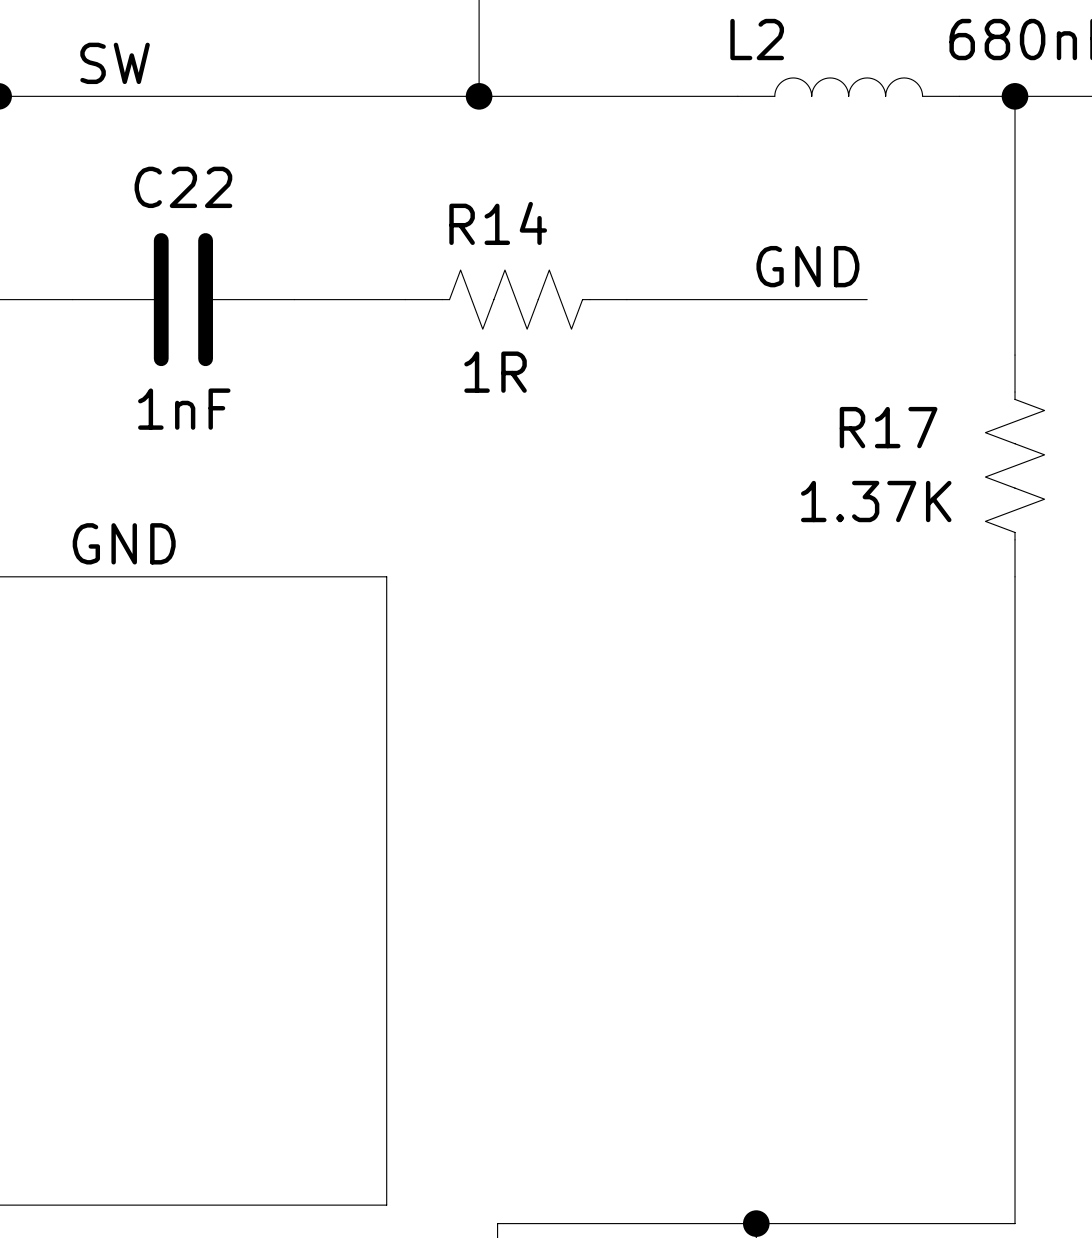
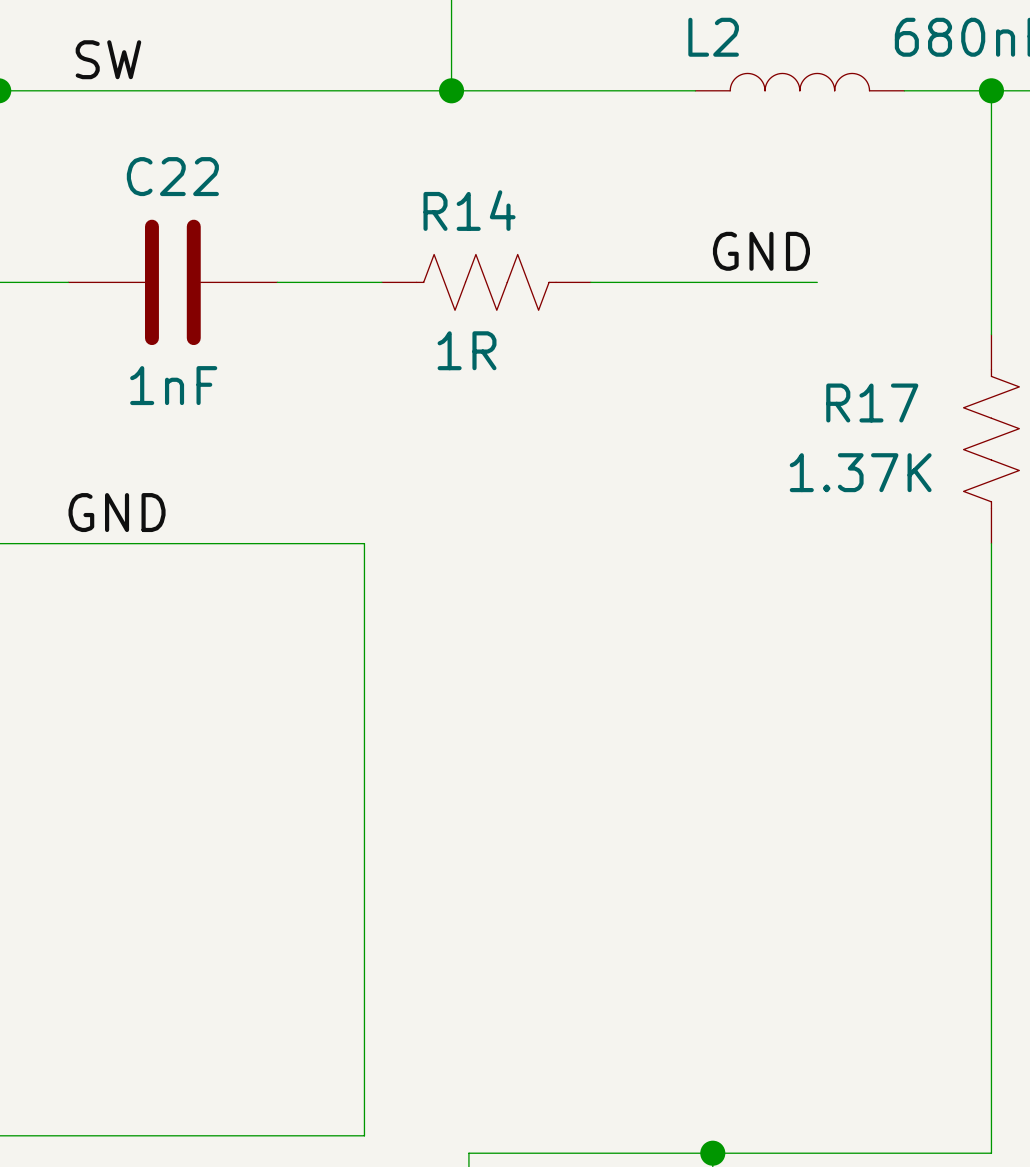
wire: (1015, 96) (1015, 355) -> (991, 90) (991, 334)
junction position: (1015, 96) -> (991, 90)
R17 position: (1015, 465) -> (991, 439)
wire: (1015, 576) (1015, 1223) -> (991, 543) (991, 1153) (956, 1153)

